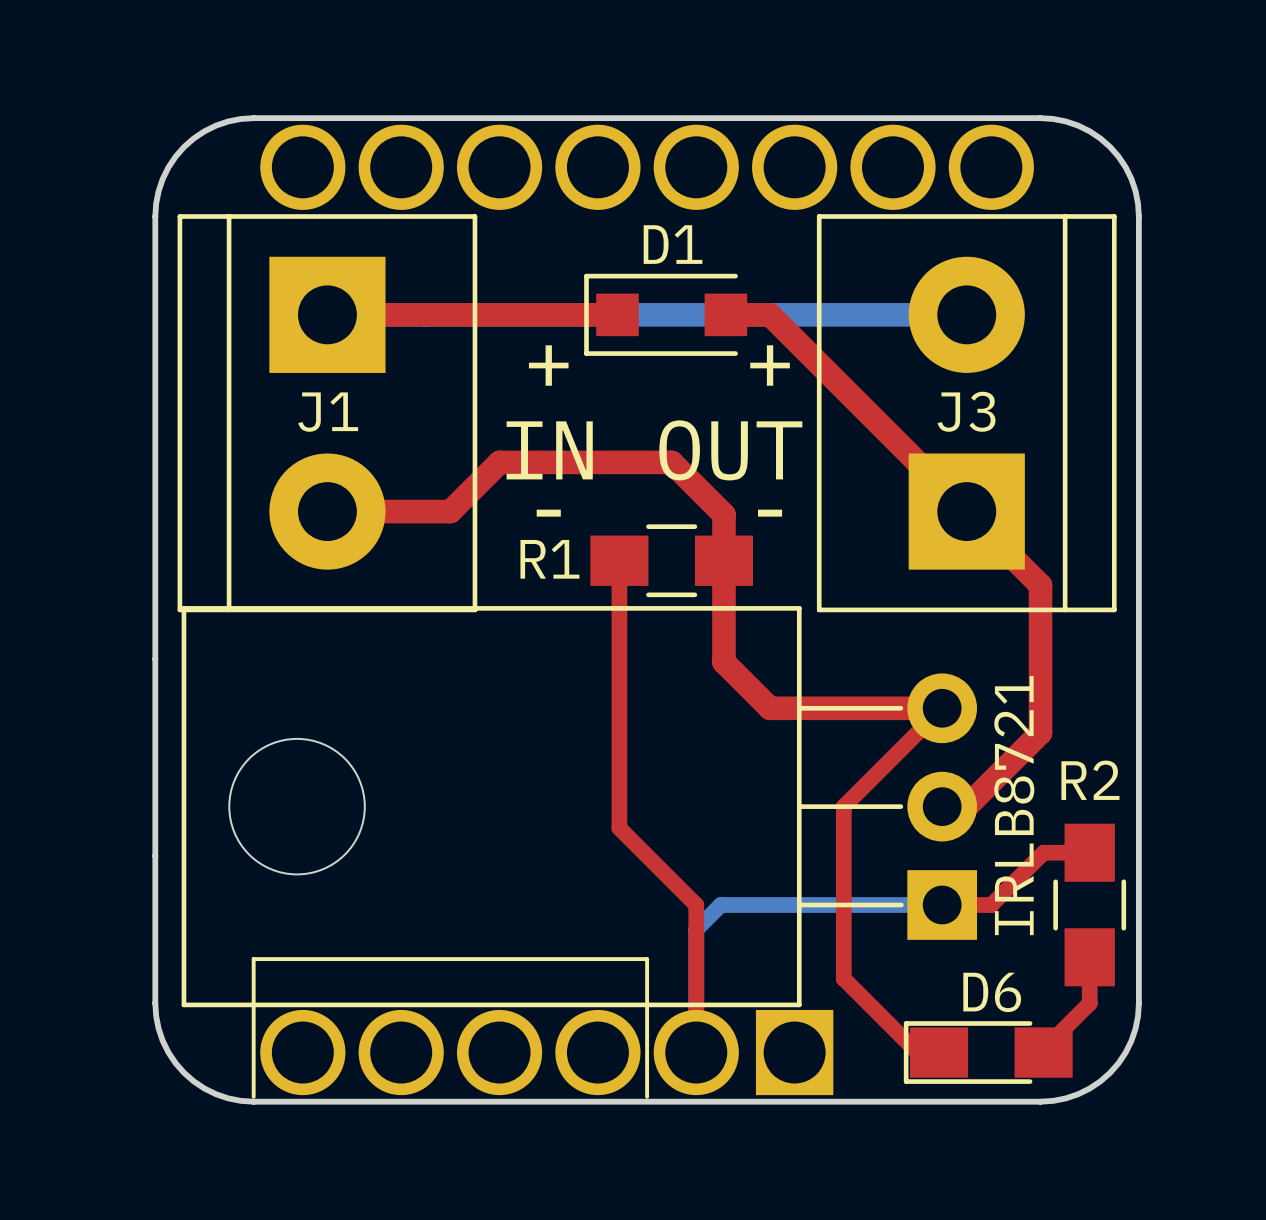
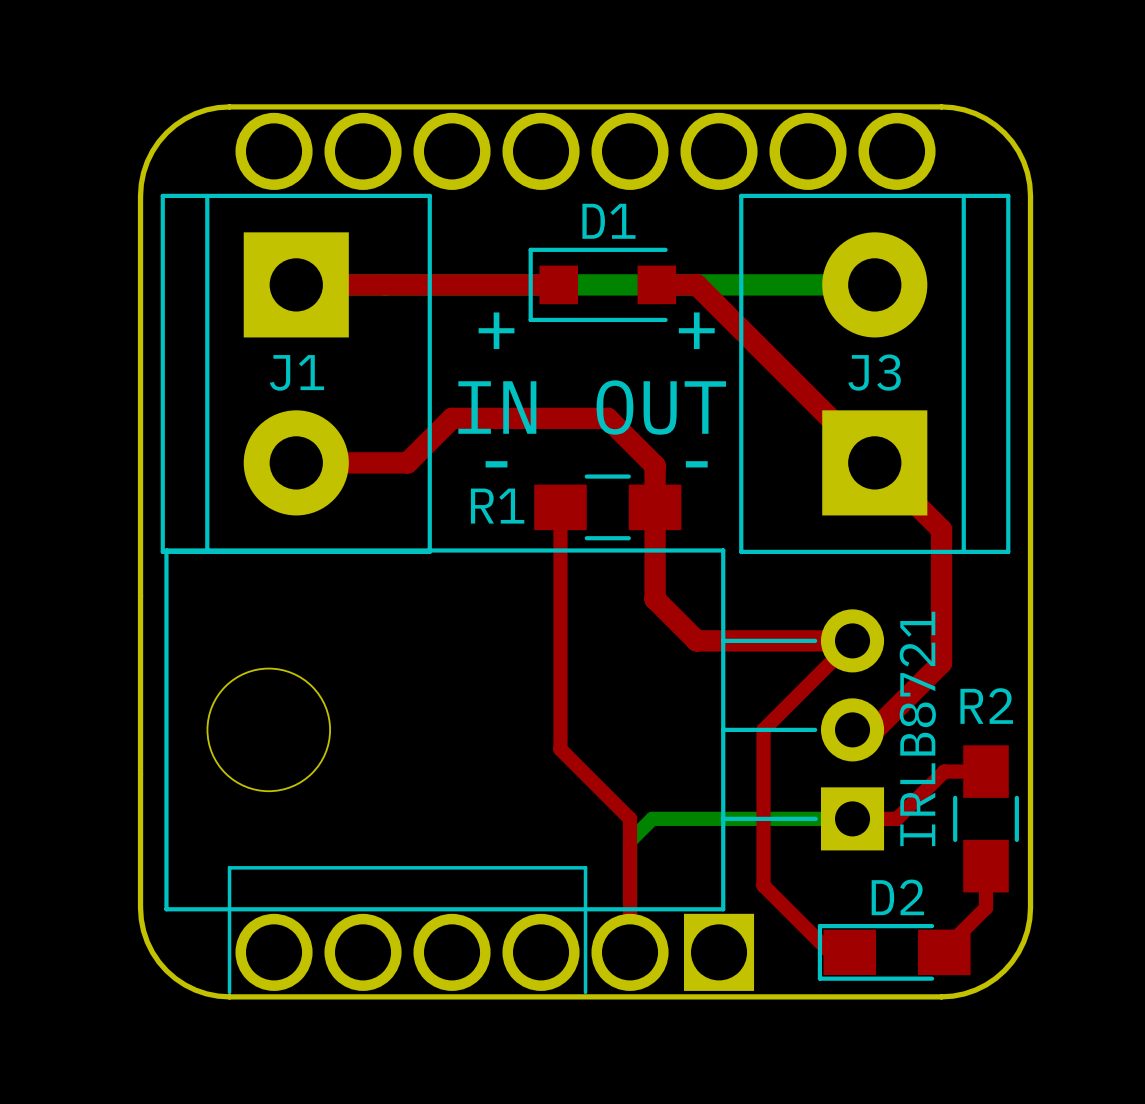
D6 name: D6 (992, 992) -> D2 (897, 897)

